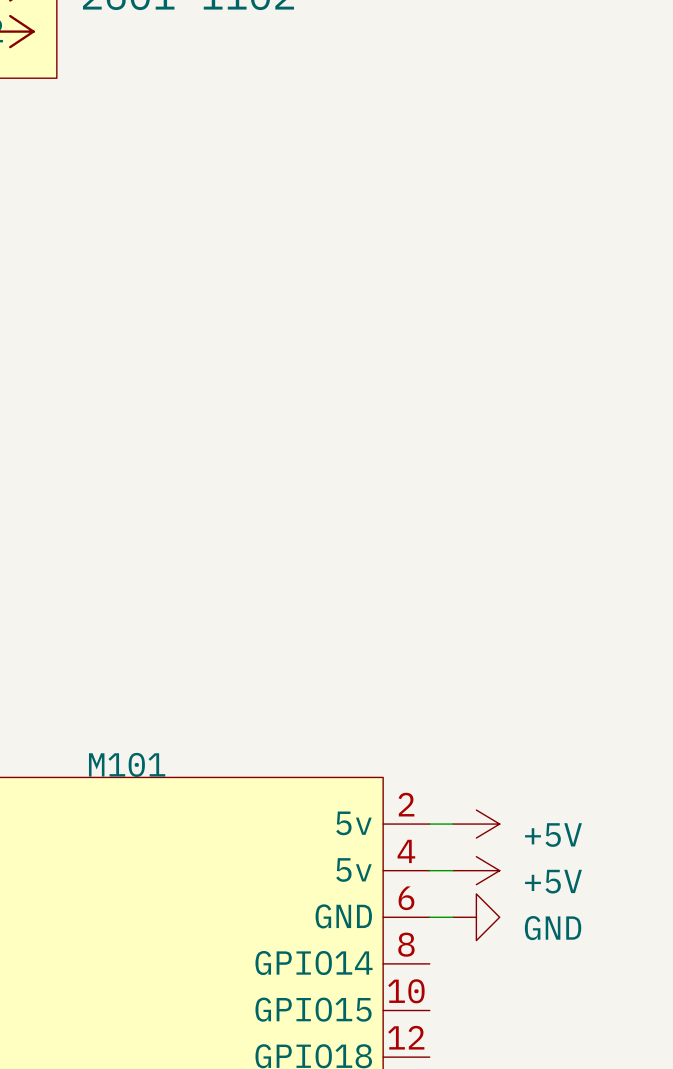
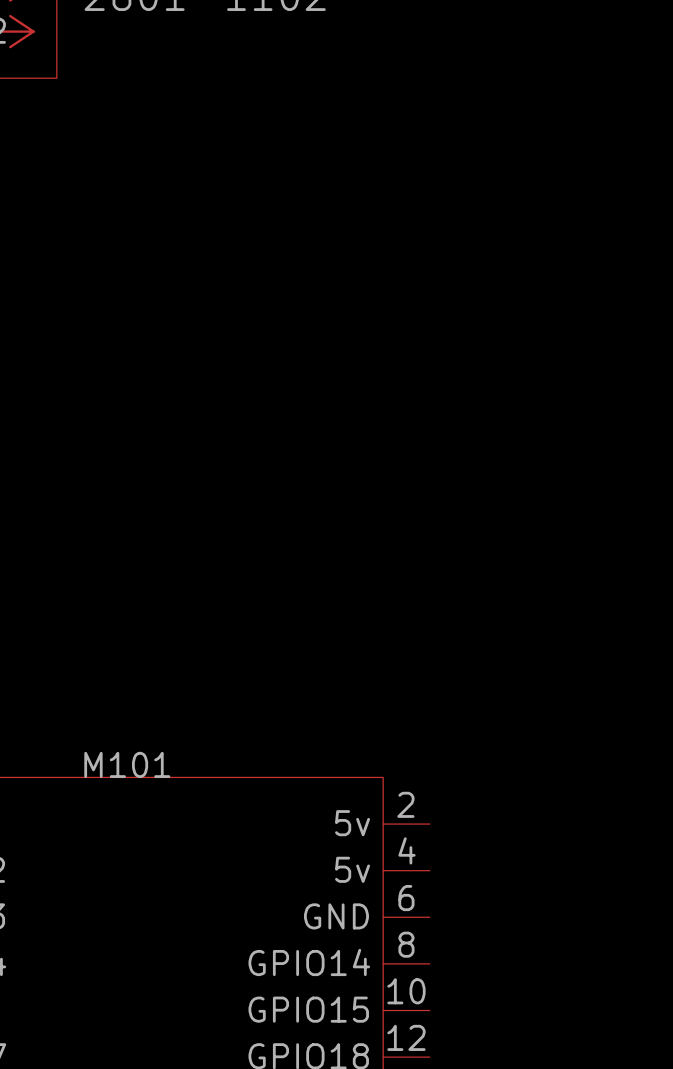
wire: (429, 824) (453, 824) -> none
power symbol: +5V (476, 824) -> none
wire: (429, 870) (453, 870) -> none
power symbol: +5V (476, 870) -> none
wire: (429, 917) (453, 917) -> none
power symbol: GND (476, 917) -> none

